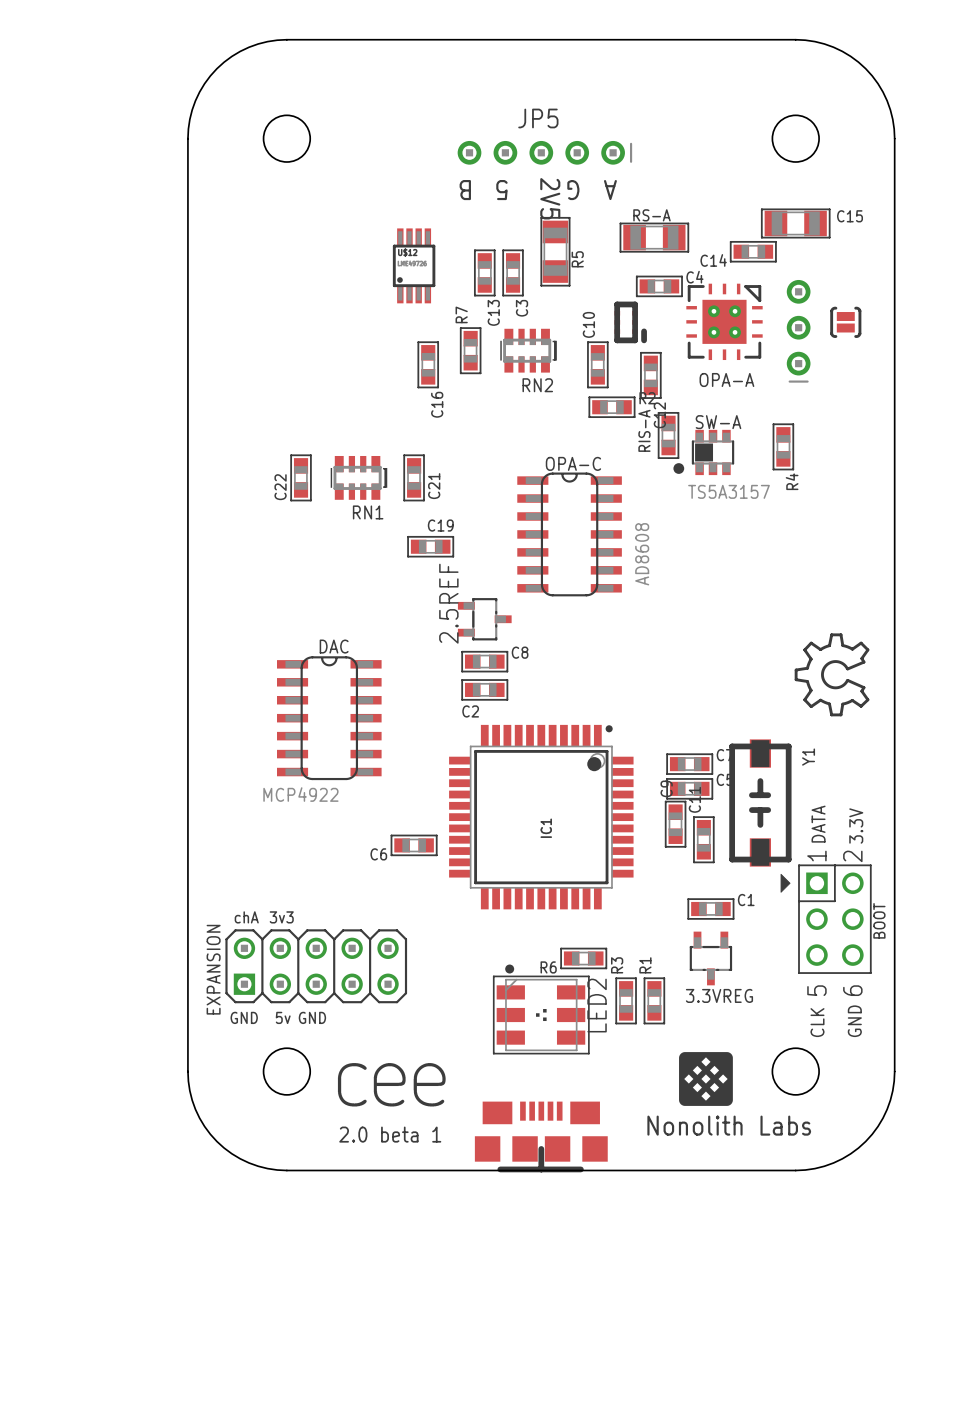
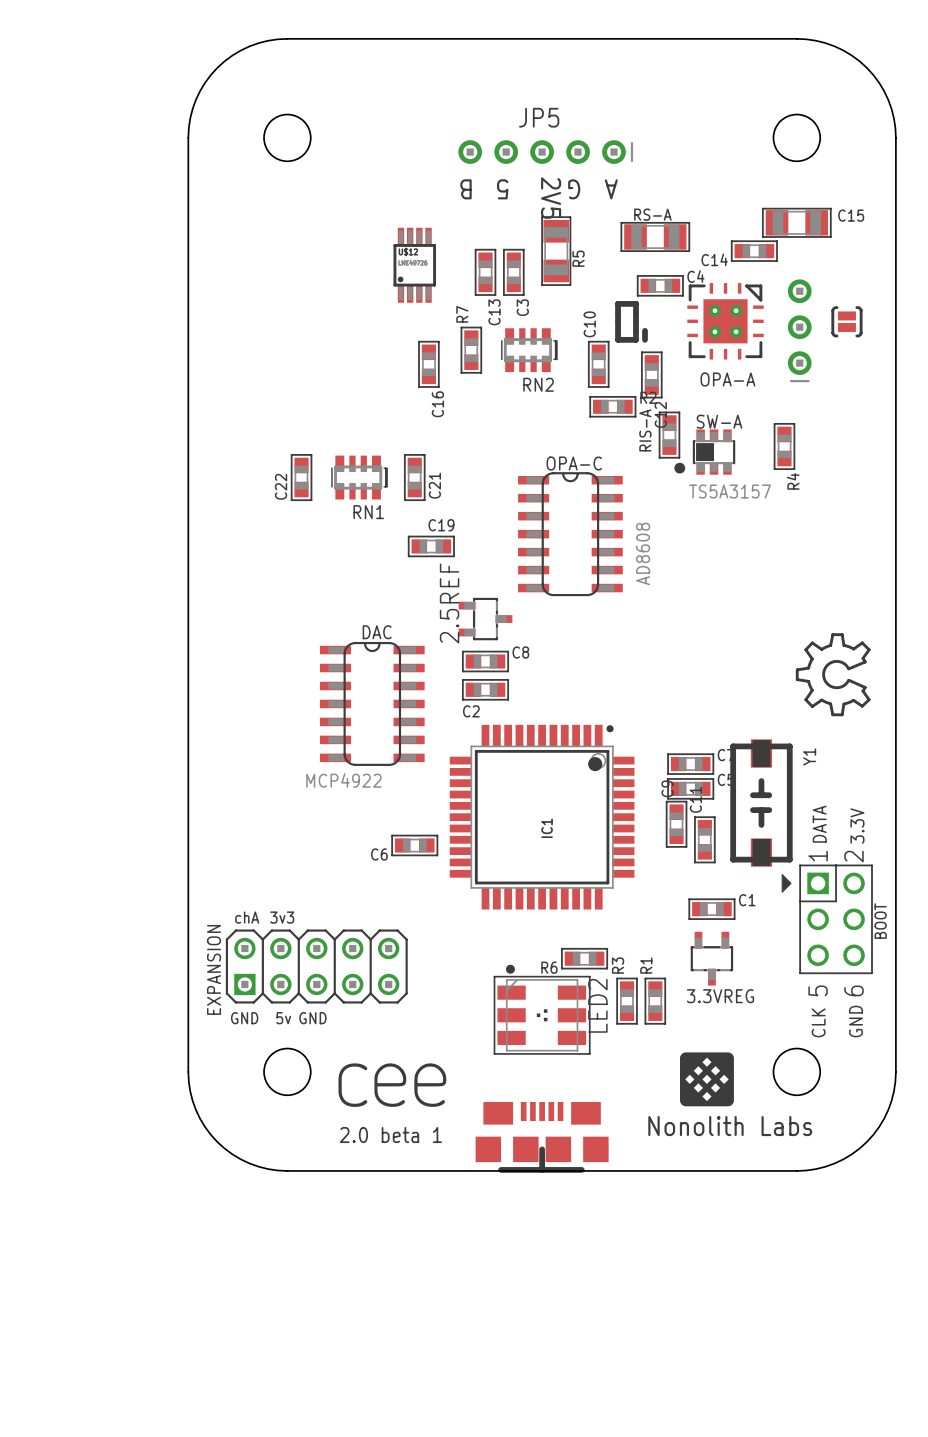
DAC position: (329, 718) -> (372, 703)

